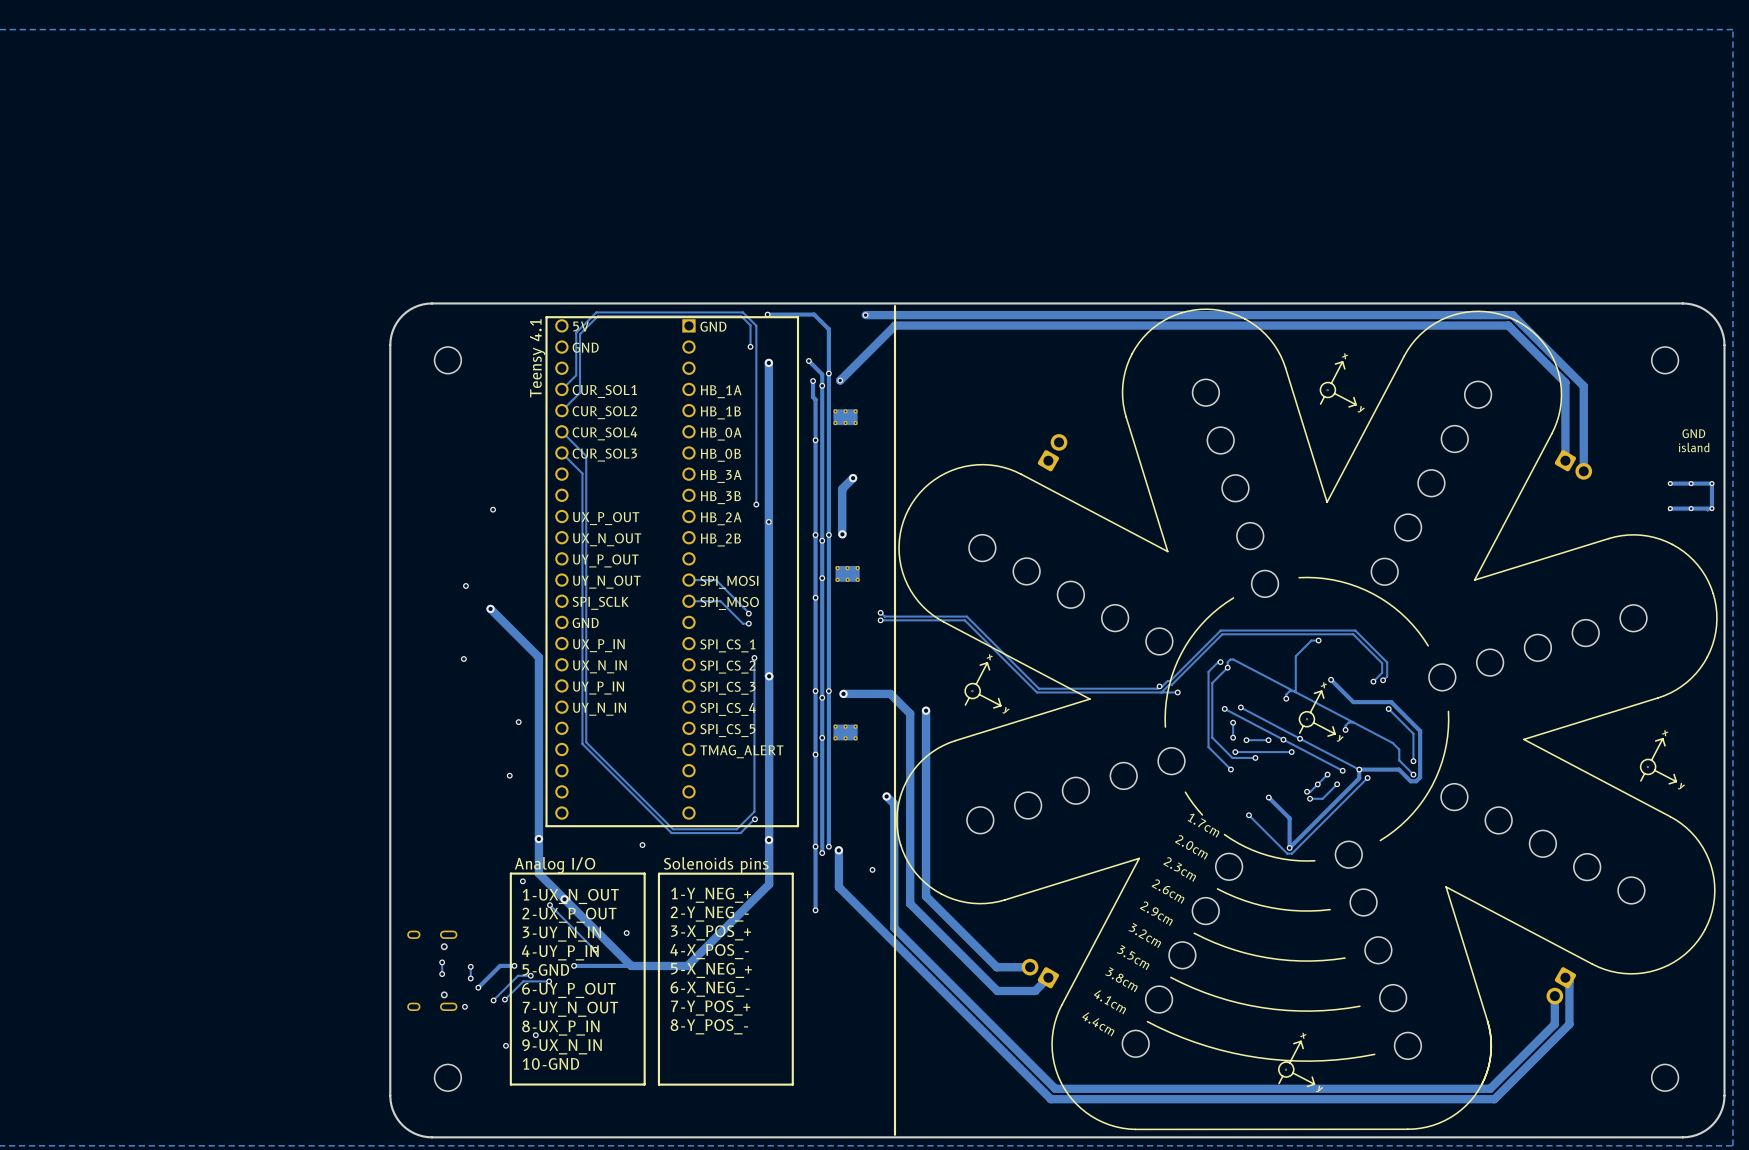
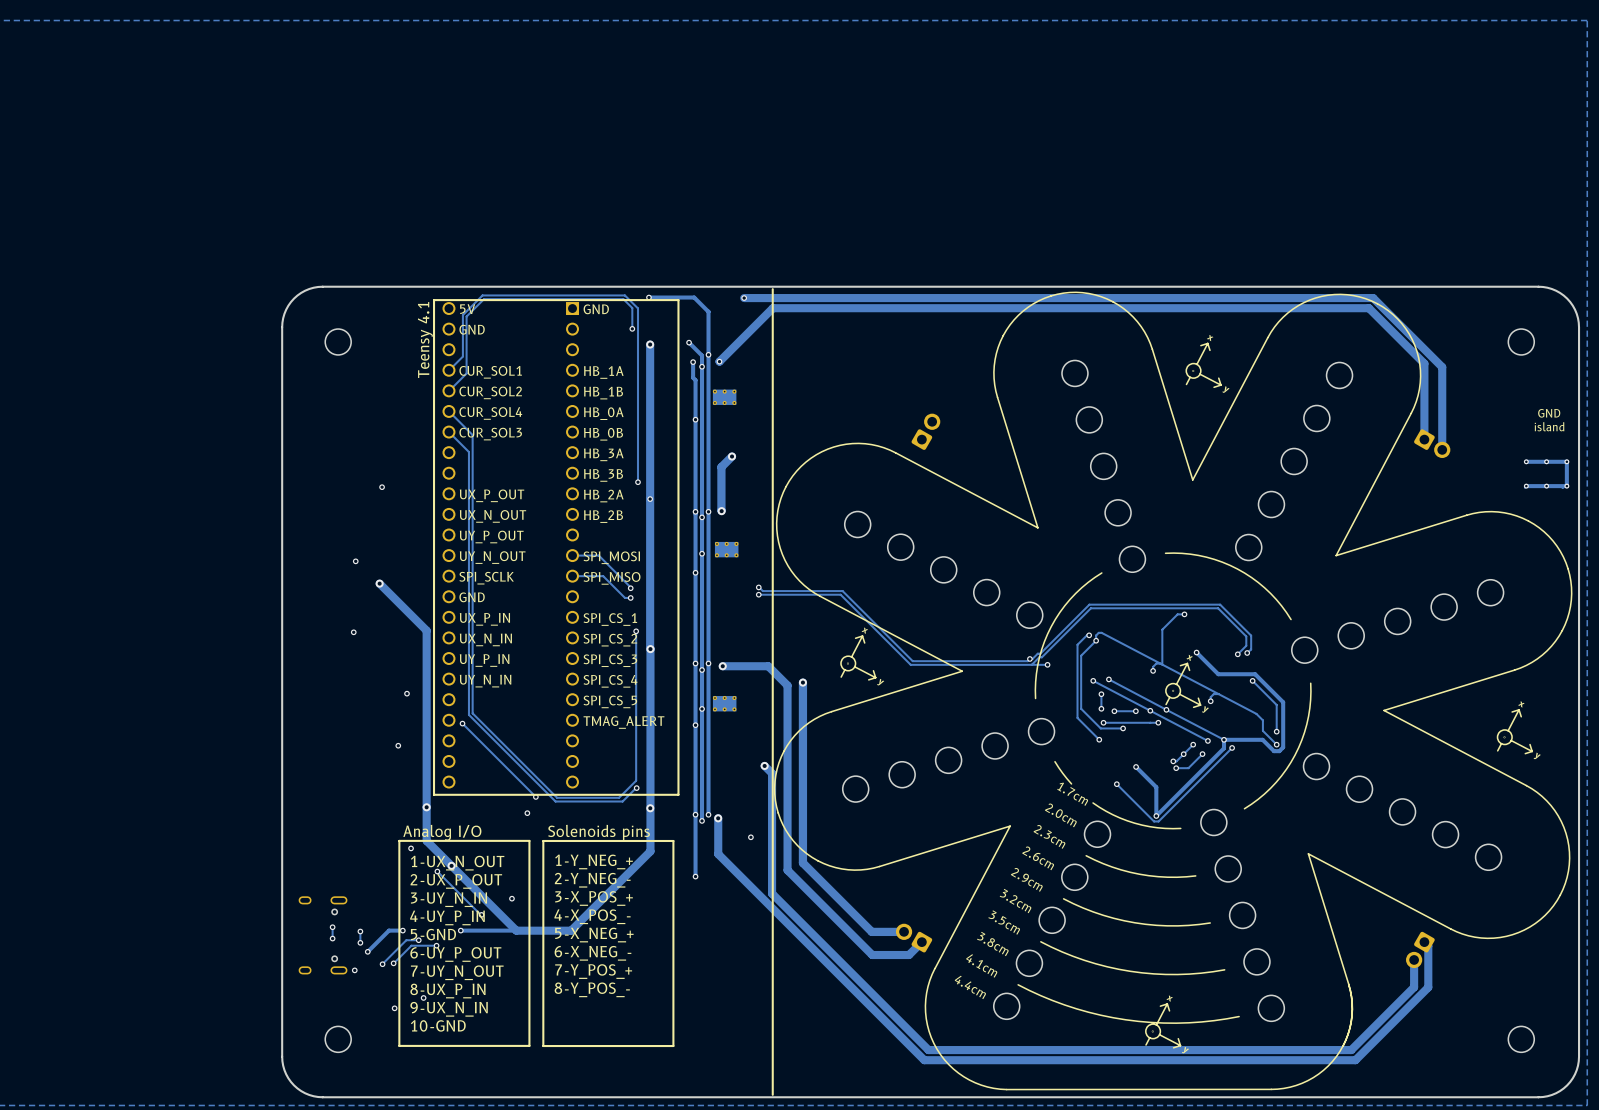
track: none -> (462, 723) (535, 796)
via: none -> (462, 723)
via: none -> (535, 796)

